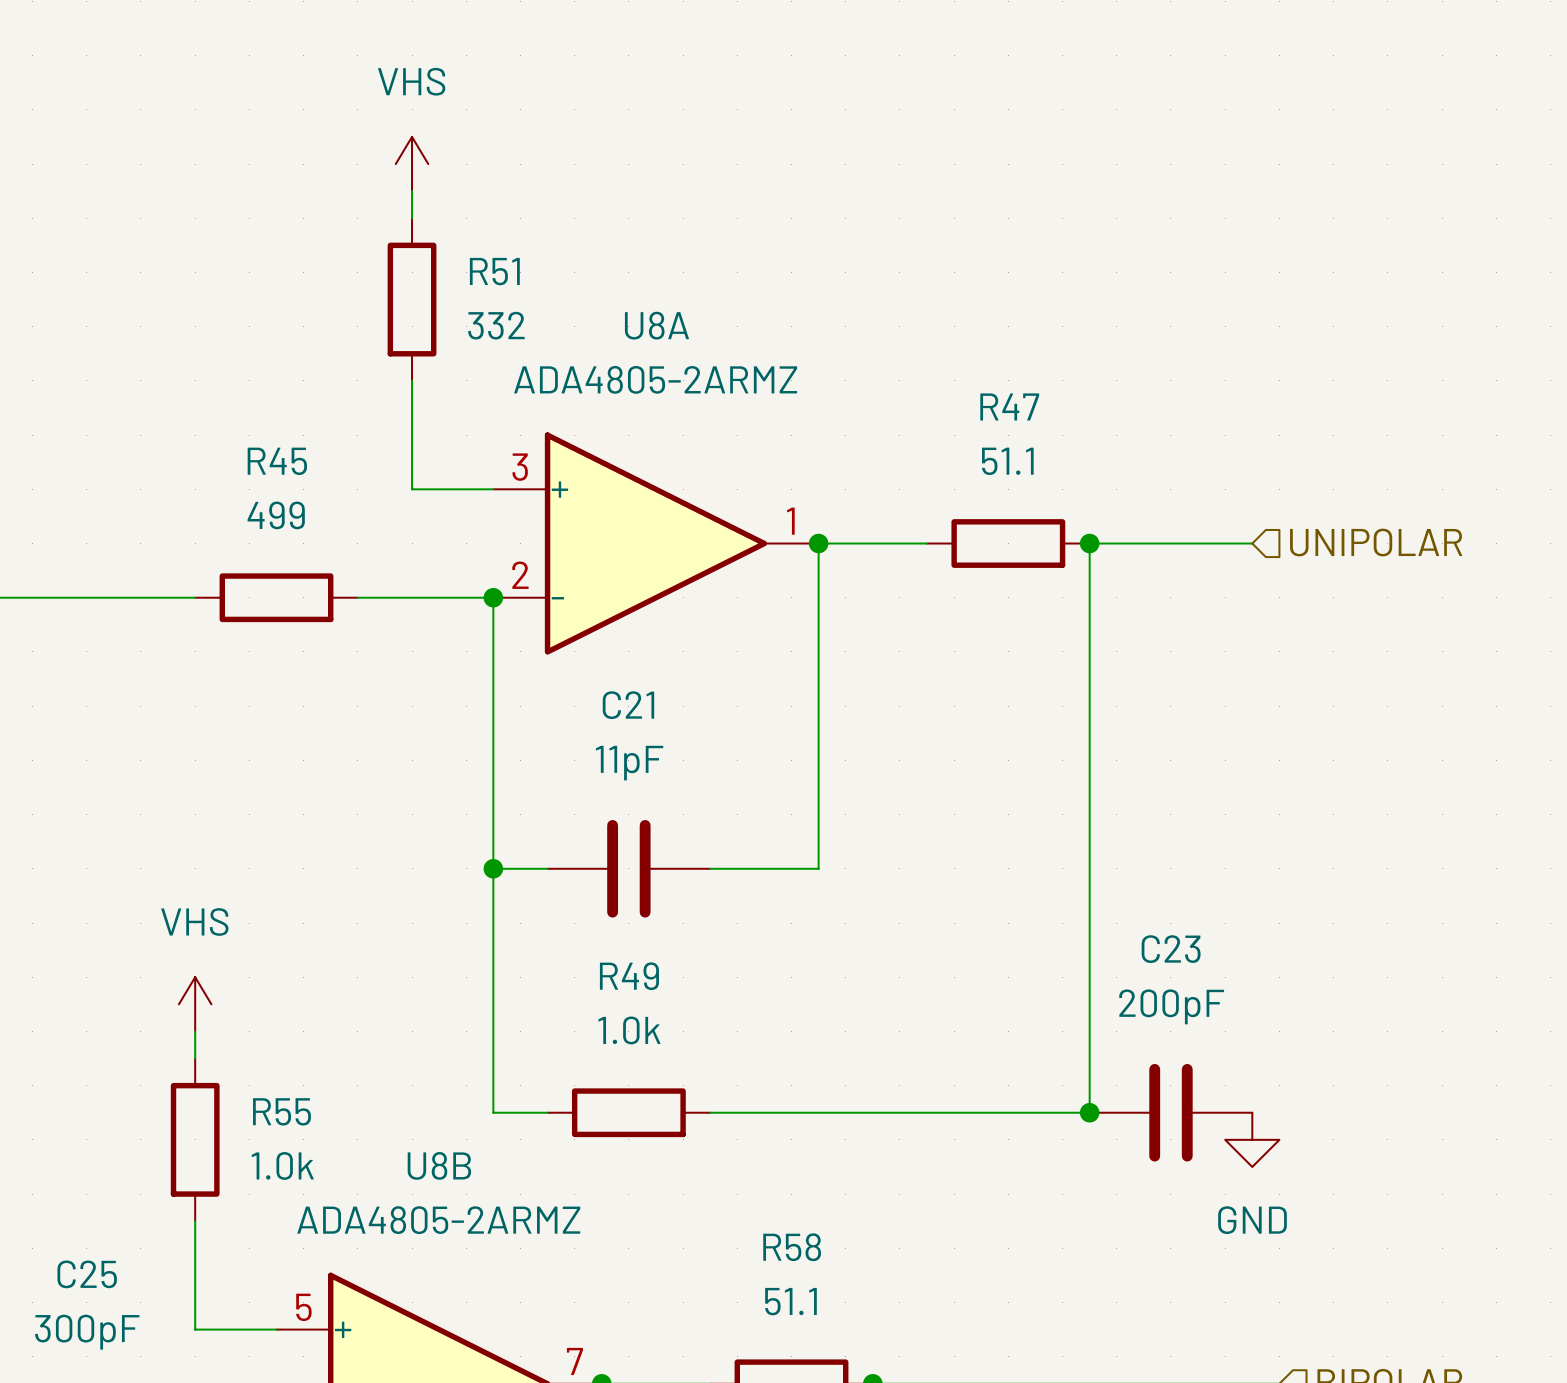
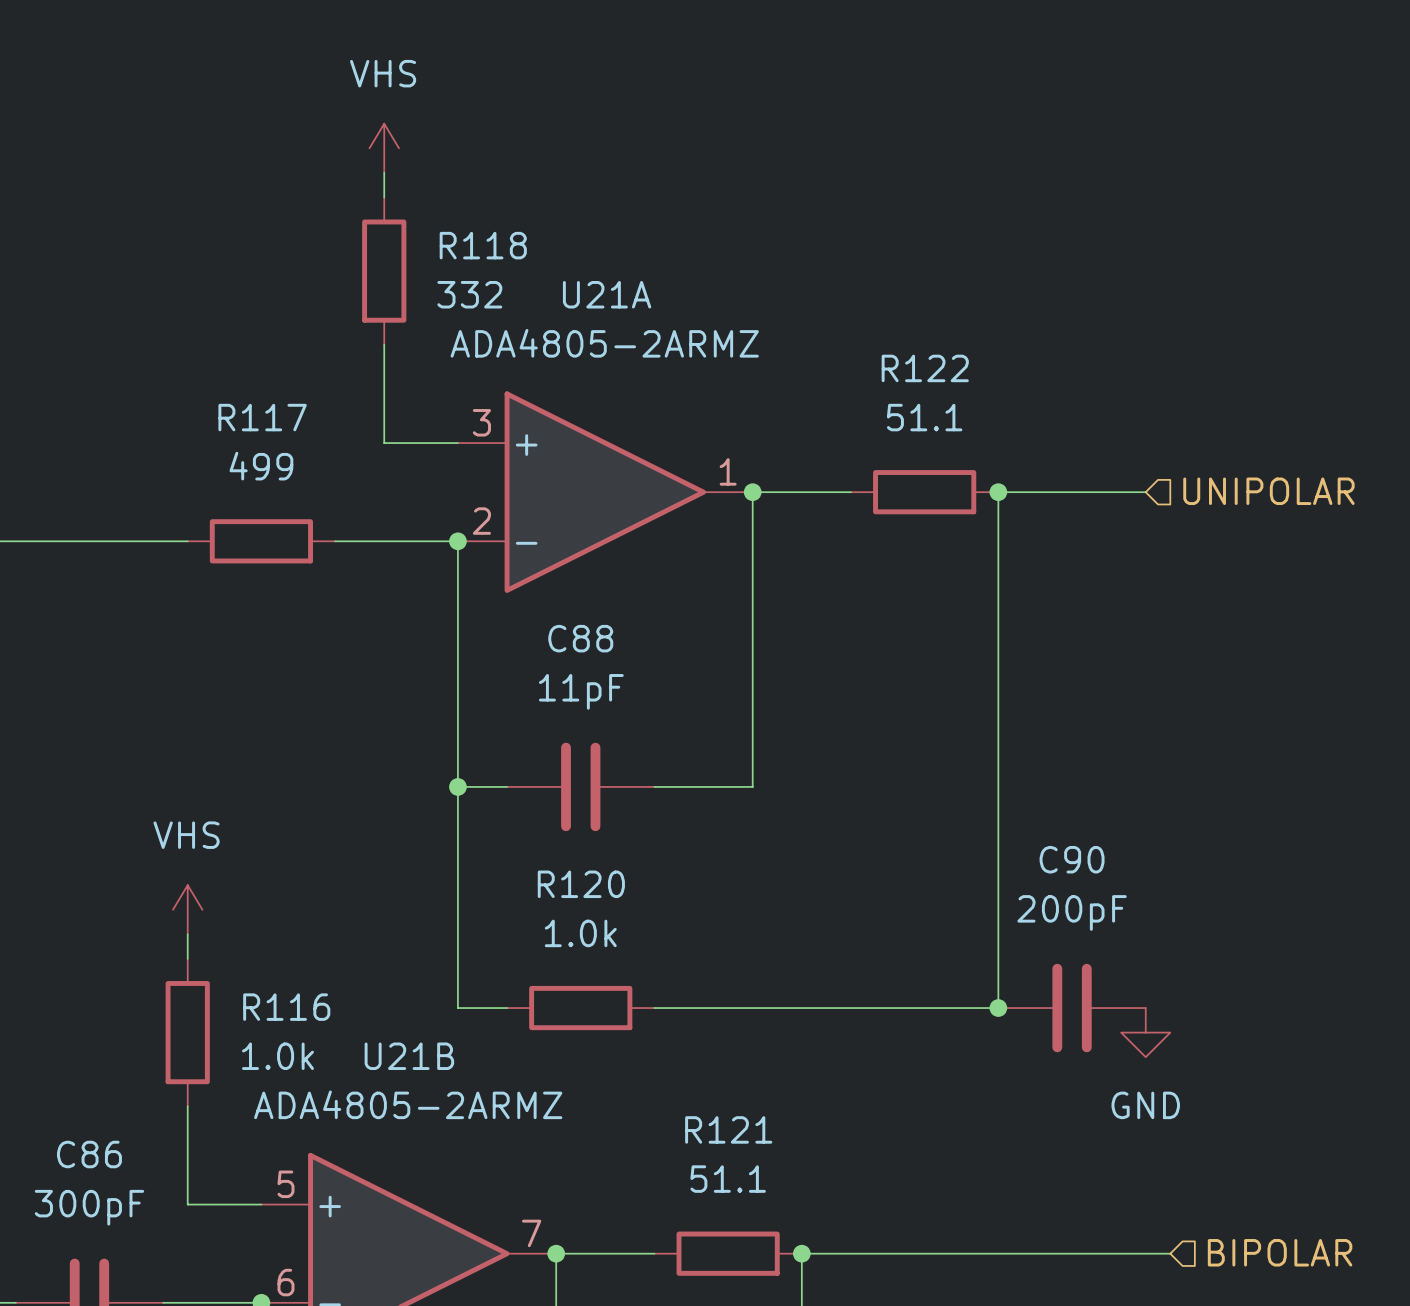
R51 name: R51 (494, 271) -> R118 (483, 245)
U8A name: U8A (656, 325) -> U21A (607, 294)
R47 name: R47 (1009, 406) -> R122 (925, 368)
R45 name: R45 (277, 461) -> R117 (262, 417)
C21 name: C21 (628, 705) -> C88 (580, 638)
C23 name: C23 (1171, 949) -> C90 (1072, 859)
R49 name: R49 (629, 976) -> R120 (581, 884)
R55 name: R55 (282, 1111) -> R116 (286, 1007)
U8B name: U8B (439, 1165) -> U21B (409, 1056)
R58 name: R58 (792, 1247) -> R121 (728, 1129)
C25 name: C25 (87, 1274) -> C86 (89, 1154)

